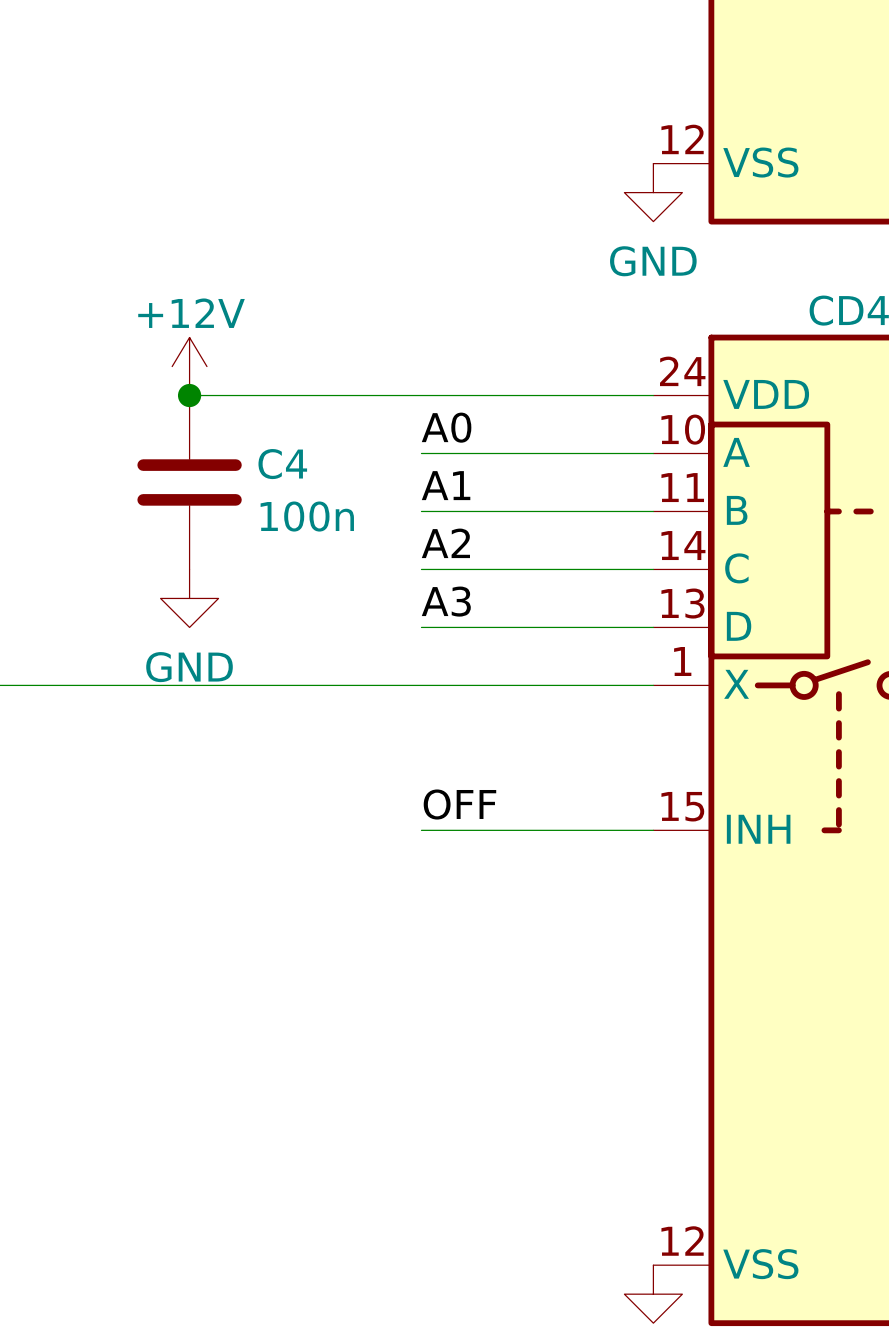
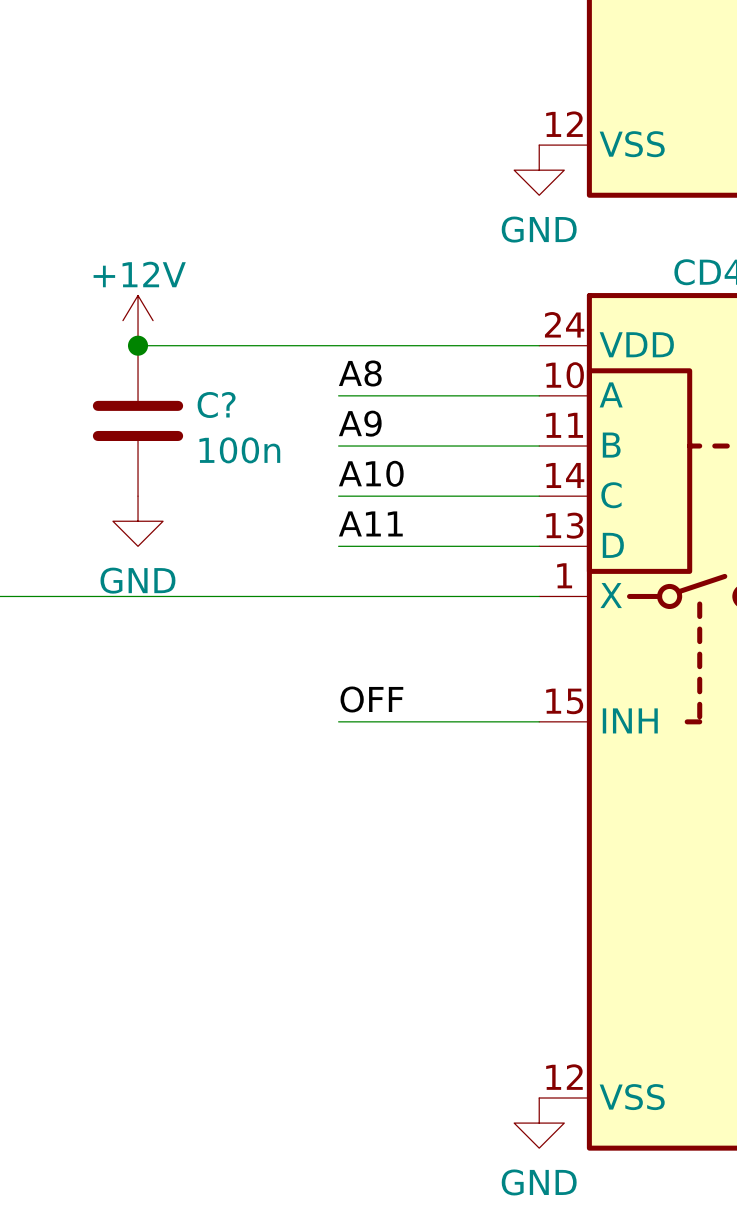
label: A0 (446, 427) -> A8 (360, 373)
C4 name: C4 (282, 464) -> C? (216, 404)
label: A1 (446, 485) -> A9 (360, 423)
label: A2 (445, 543) -> A10 (371, 473)
label: A3 (446, 601) -> A11 (370, 523)

